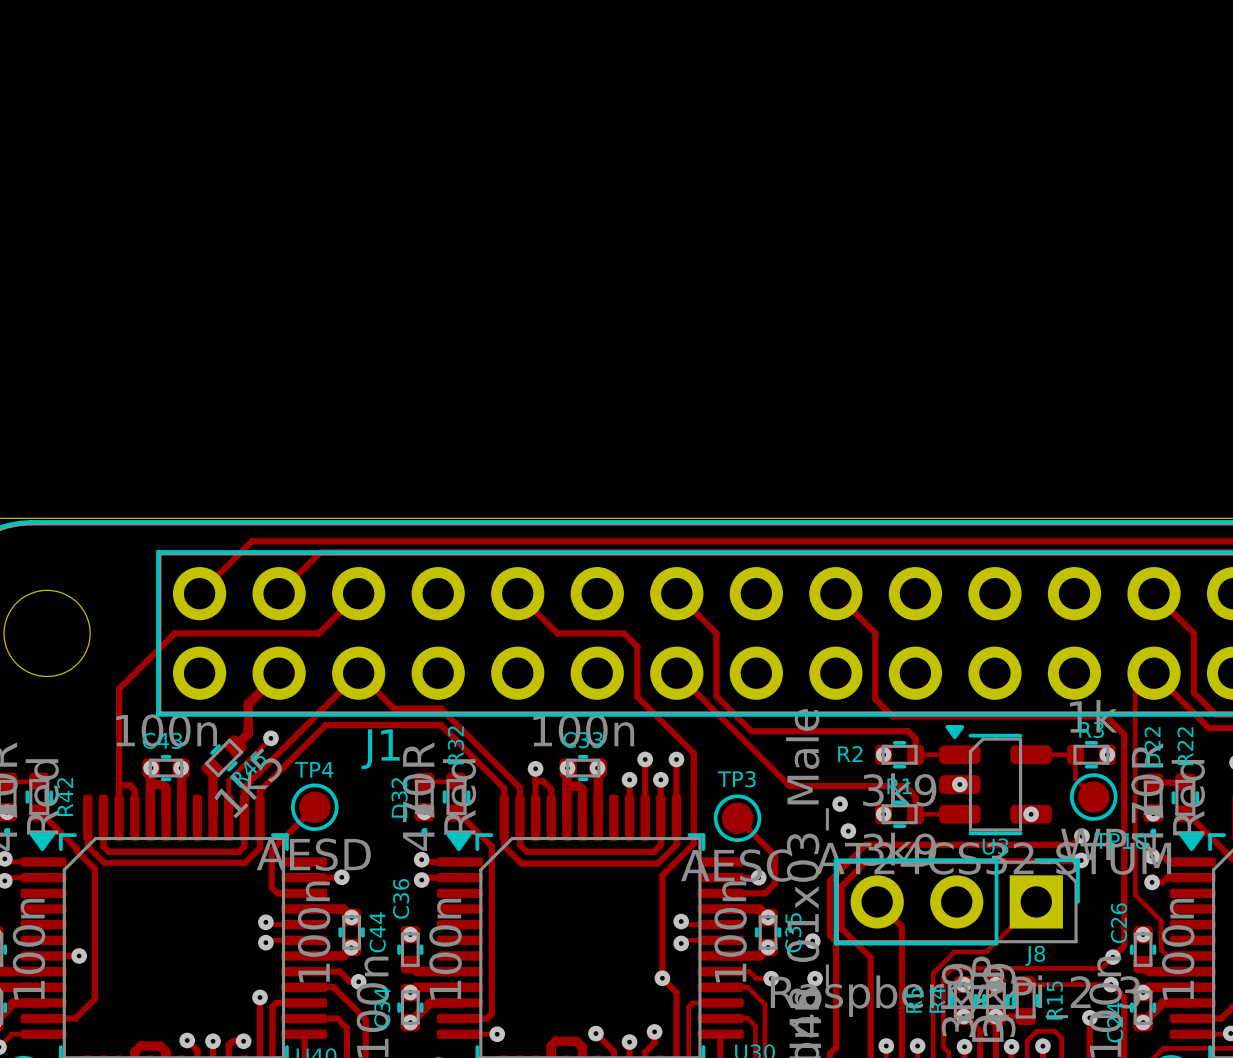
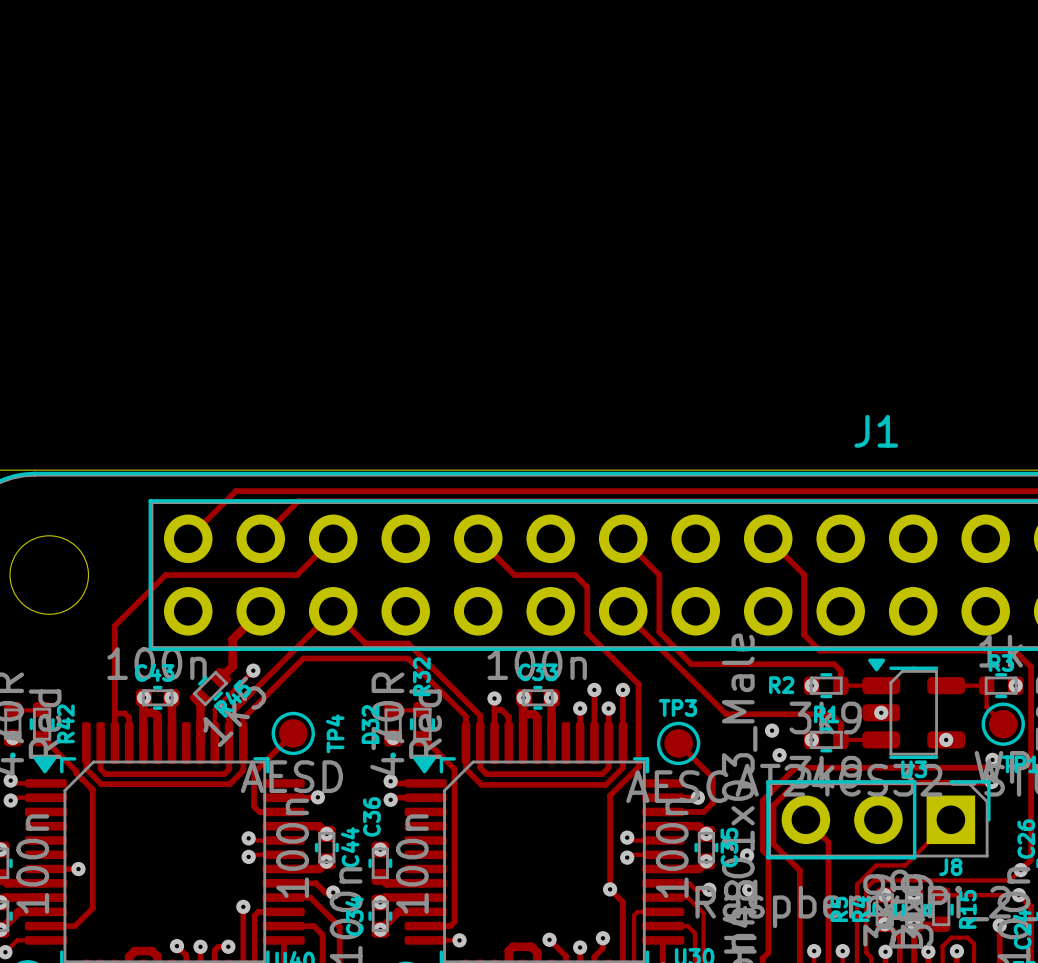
J1 name position: J1 (380, 749) -> J1 (876, 431)
TP4 name rotation: 0° (314, 769) -> 90° counterclockwise (335, 733)
TP4 name position: TP4 (314, 769) -> TP4 (335, 733)

